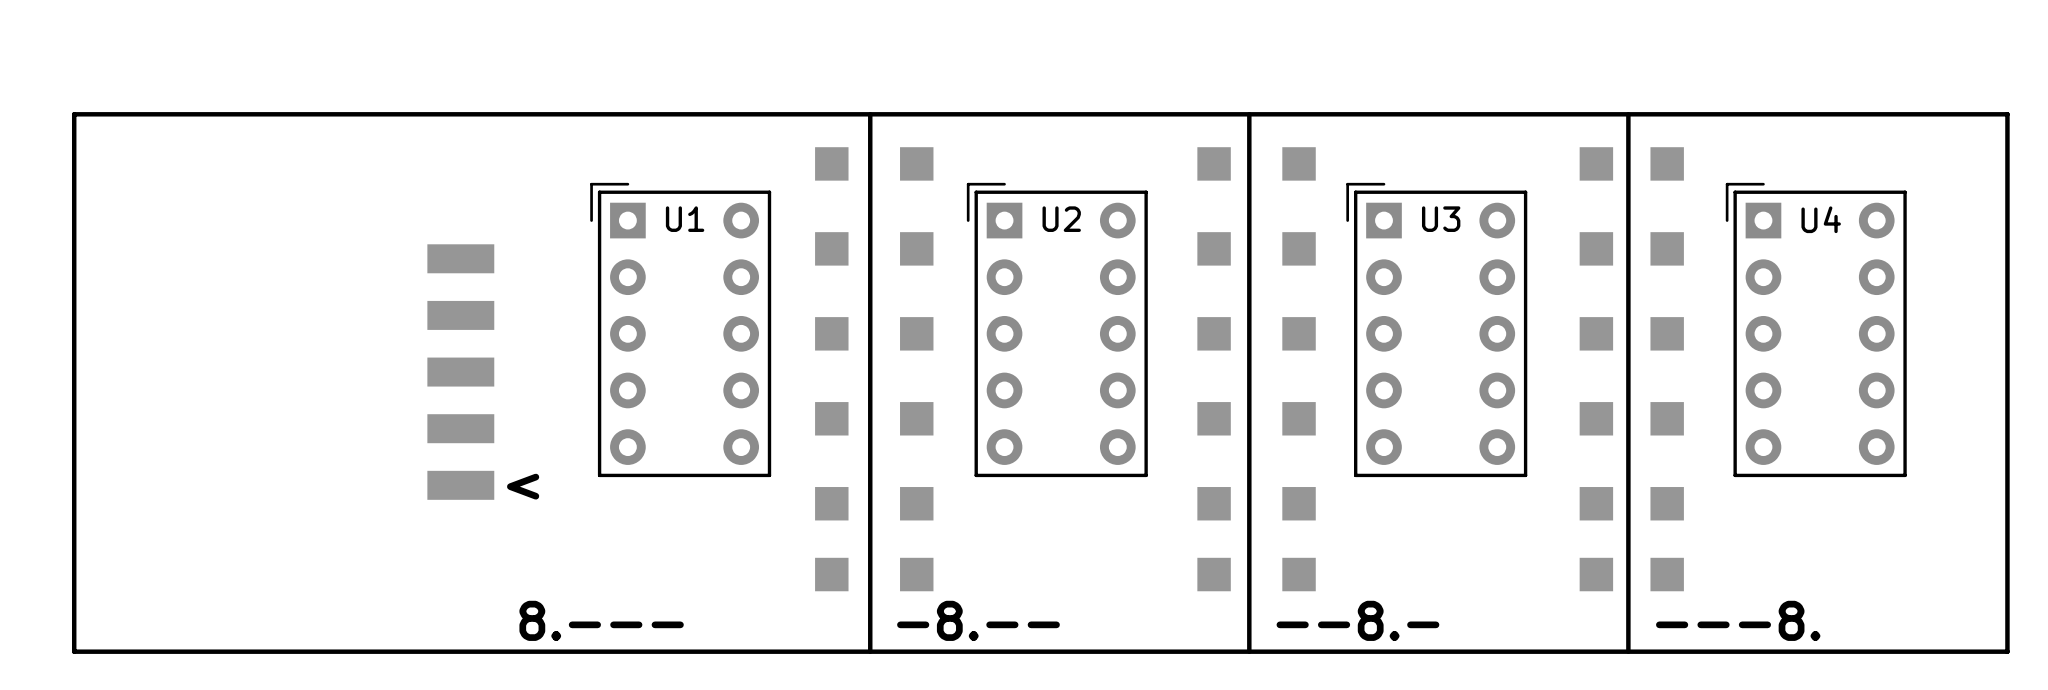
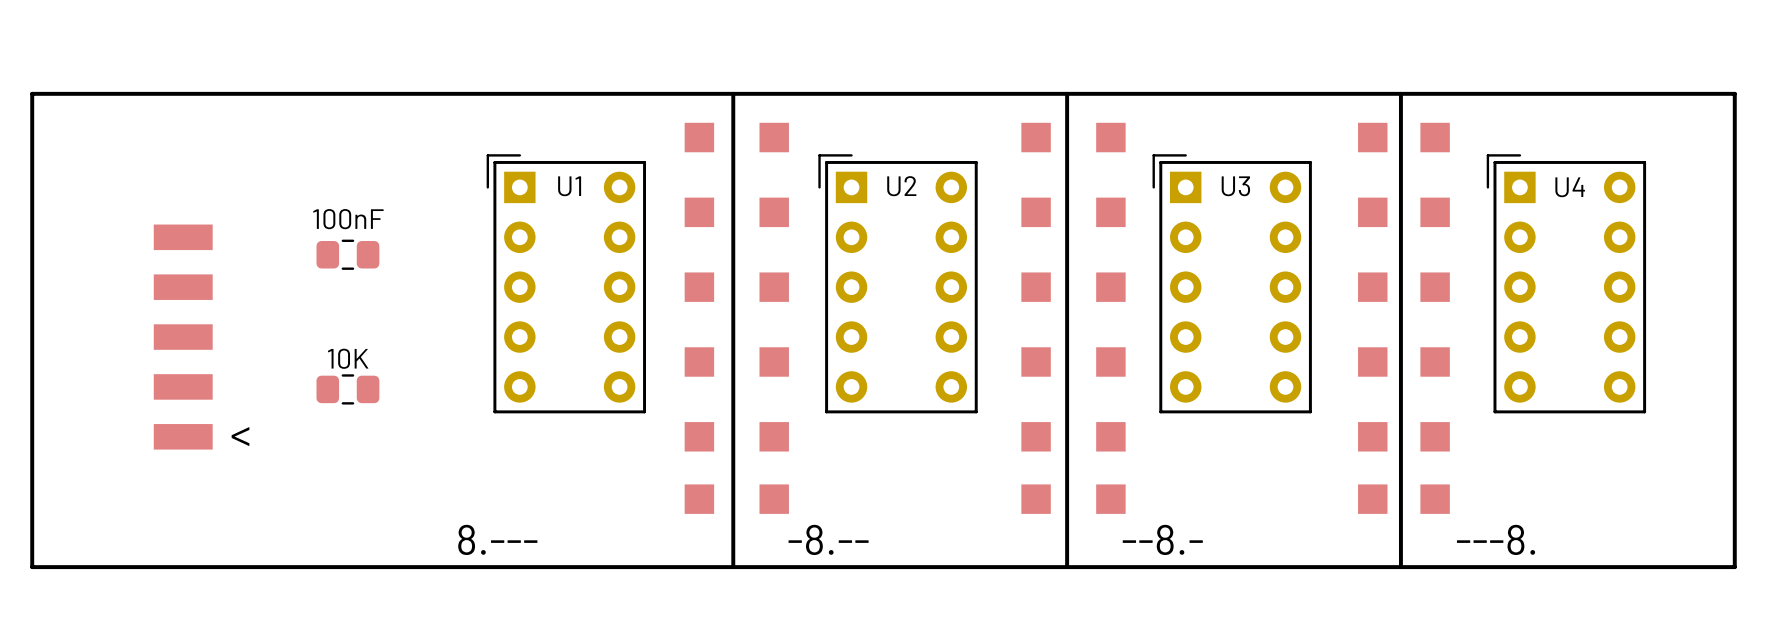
part: none -> 100nF (347, 254)
part position: (460, 372) -> (183, 337)
part: none -> 10K (347, 389)
text position: < (523, 486) -> < (240, 436)

